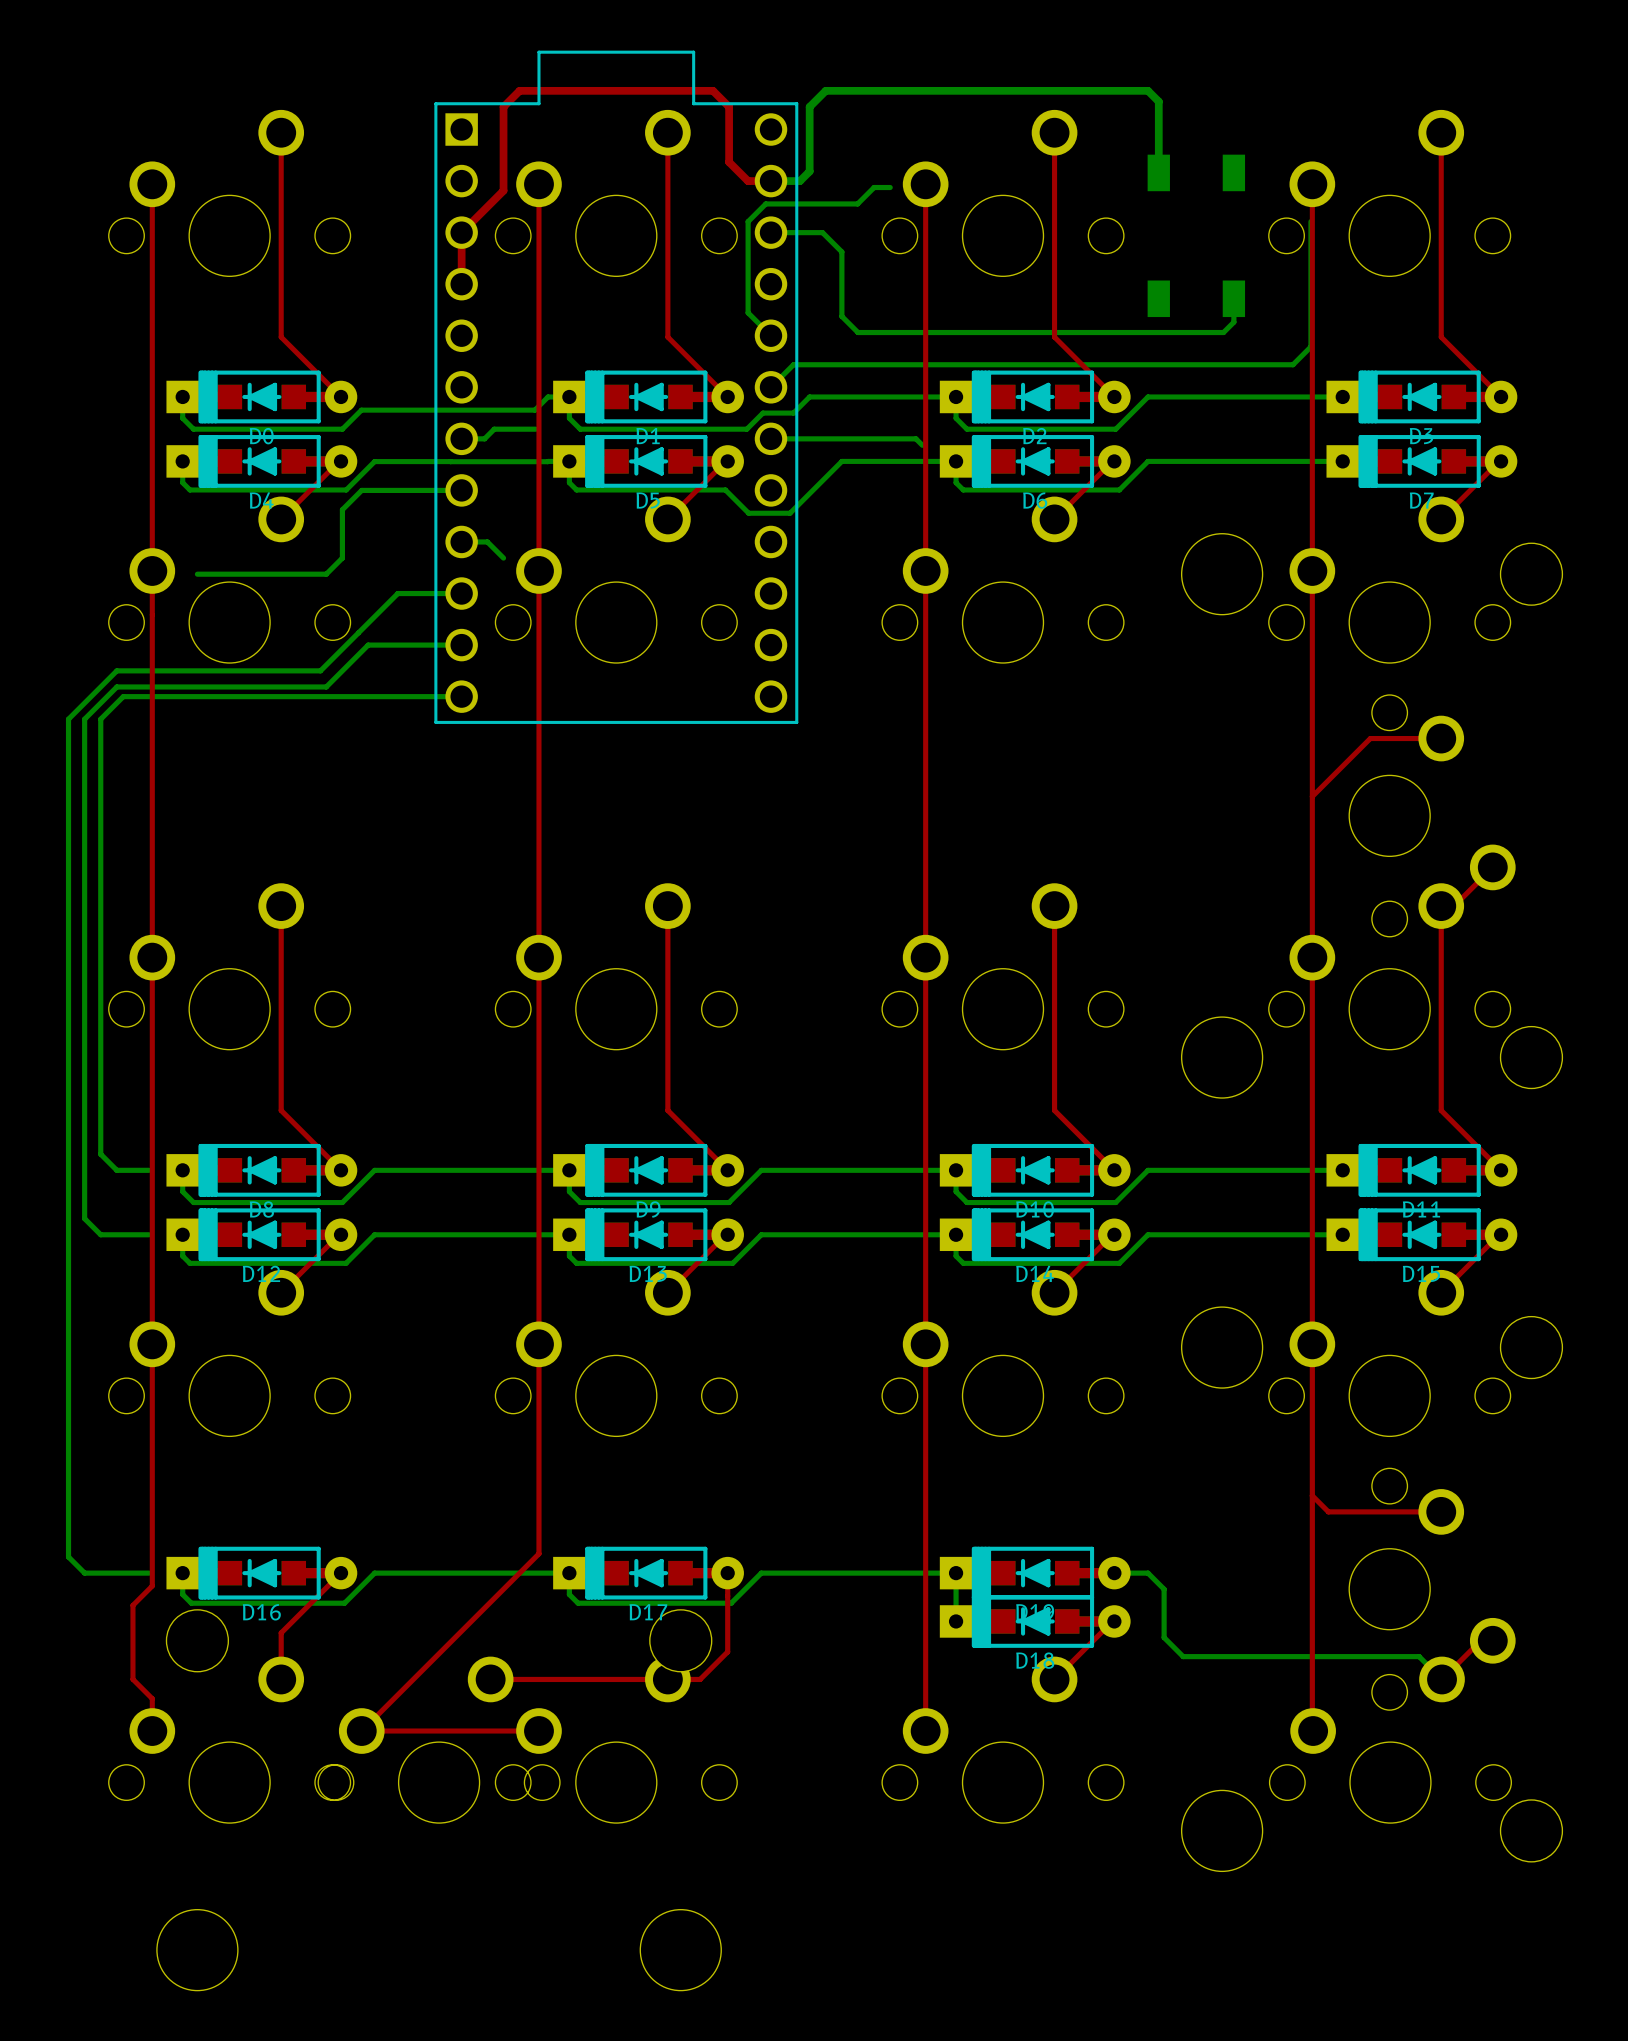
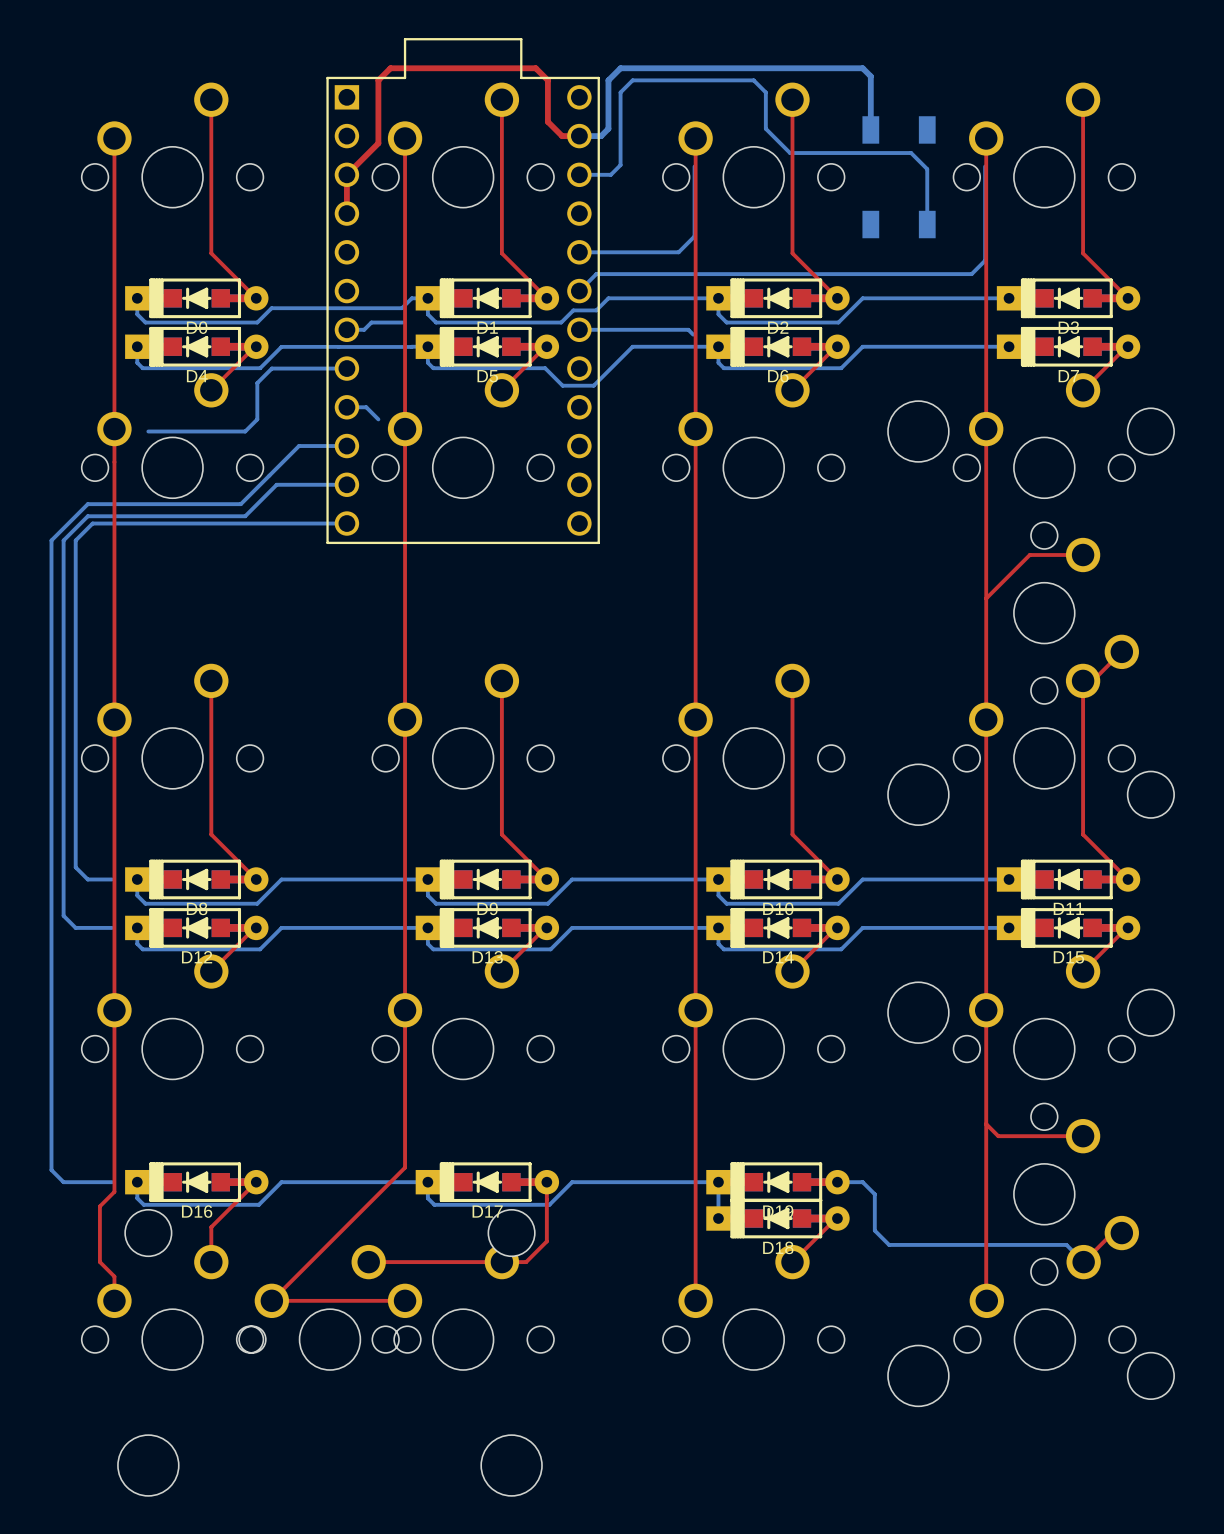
bottom track: (890, 187) (874, 187) (857, 203) (765, 203) (748, 221) (748, 312) (770, 335) -> (694, 166) (694, 236) (678, 252) (579, 252)
bottom track: (812, 232) (822, 232) (841, 251) (841, 316) (857, 332) (1223, 332) (1233, 322) (1233, 298) -> (610, 174) (620, 165) (620, 92) (632, 80) (753, 80) (765, 92) (765, 128) (790, 153) (911, 153) (927, 169) (927, 224)

